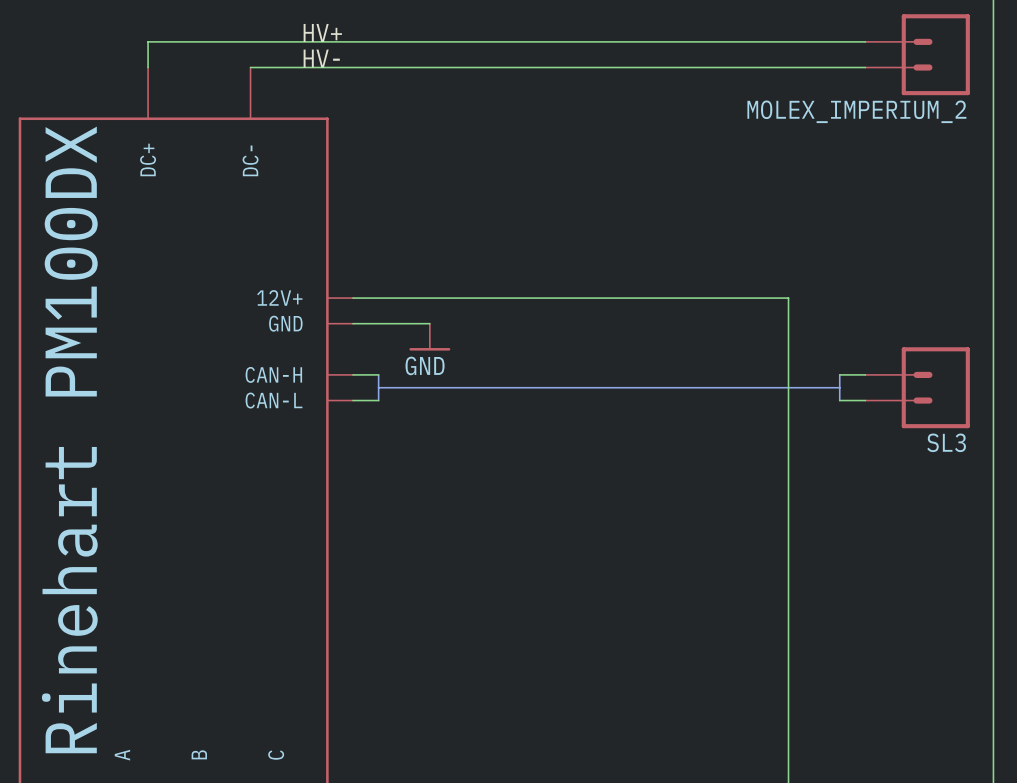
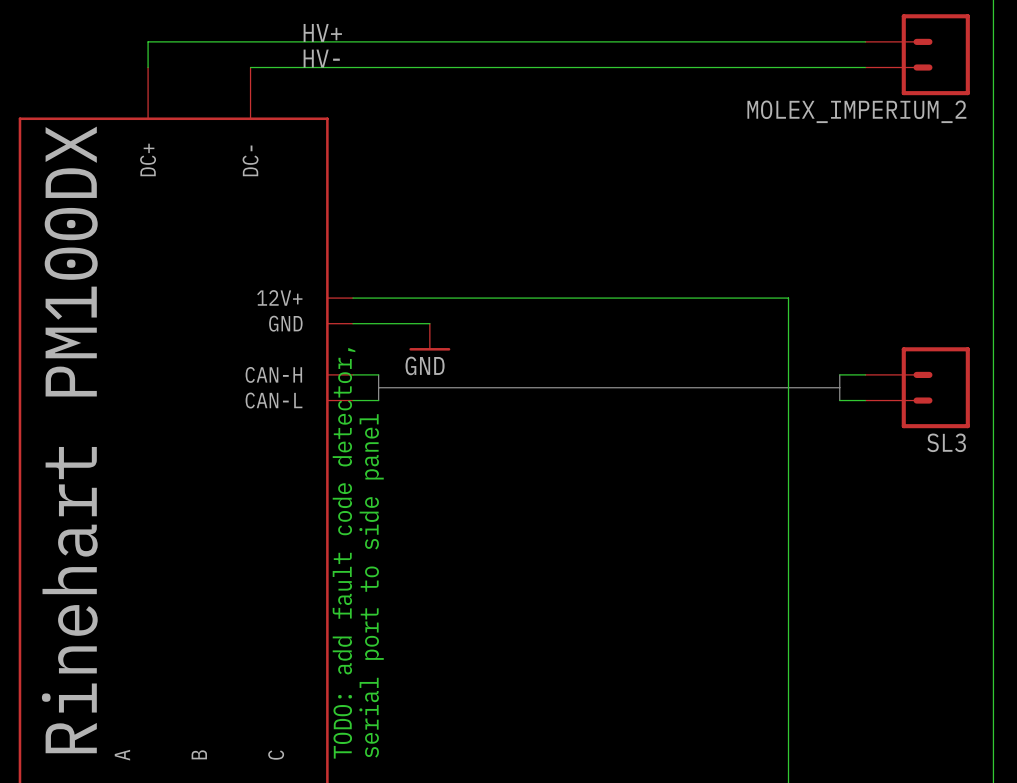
text: none -> TODO: add fault code detector, (344, 553)
text: none -> serial port to side panel (371, 585)

